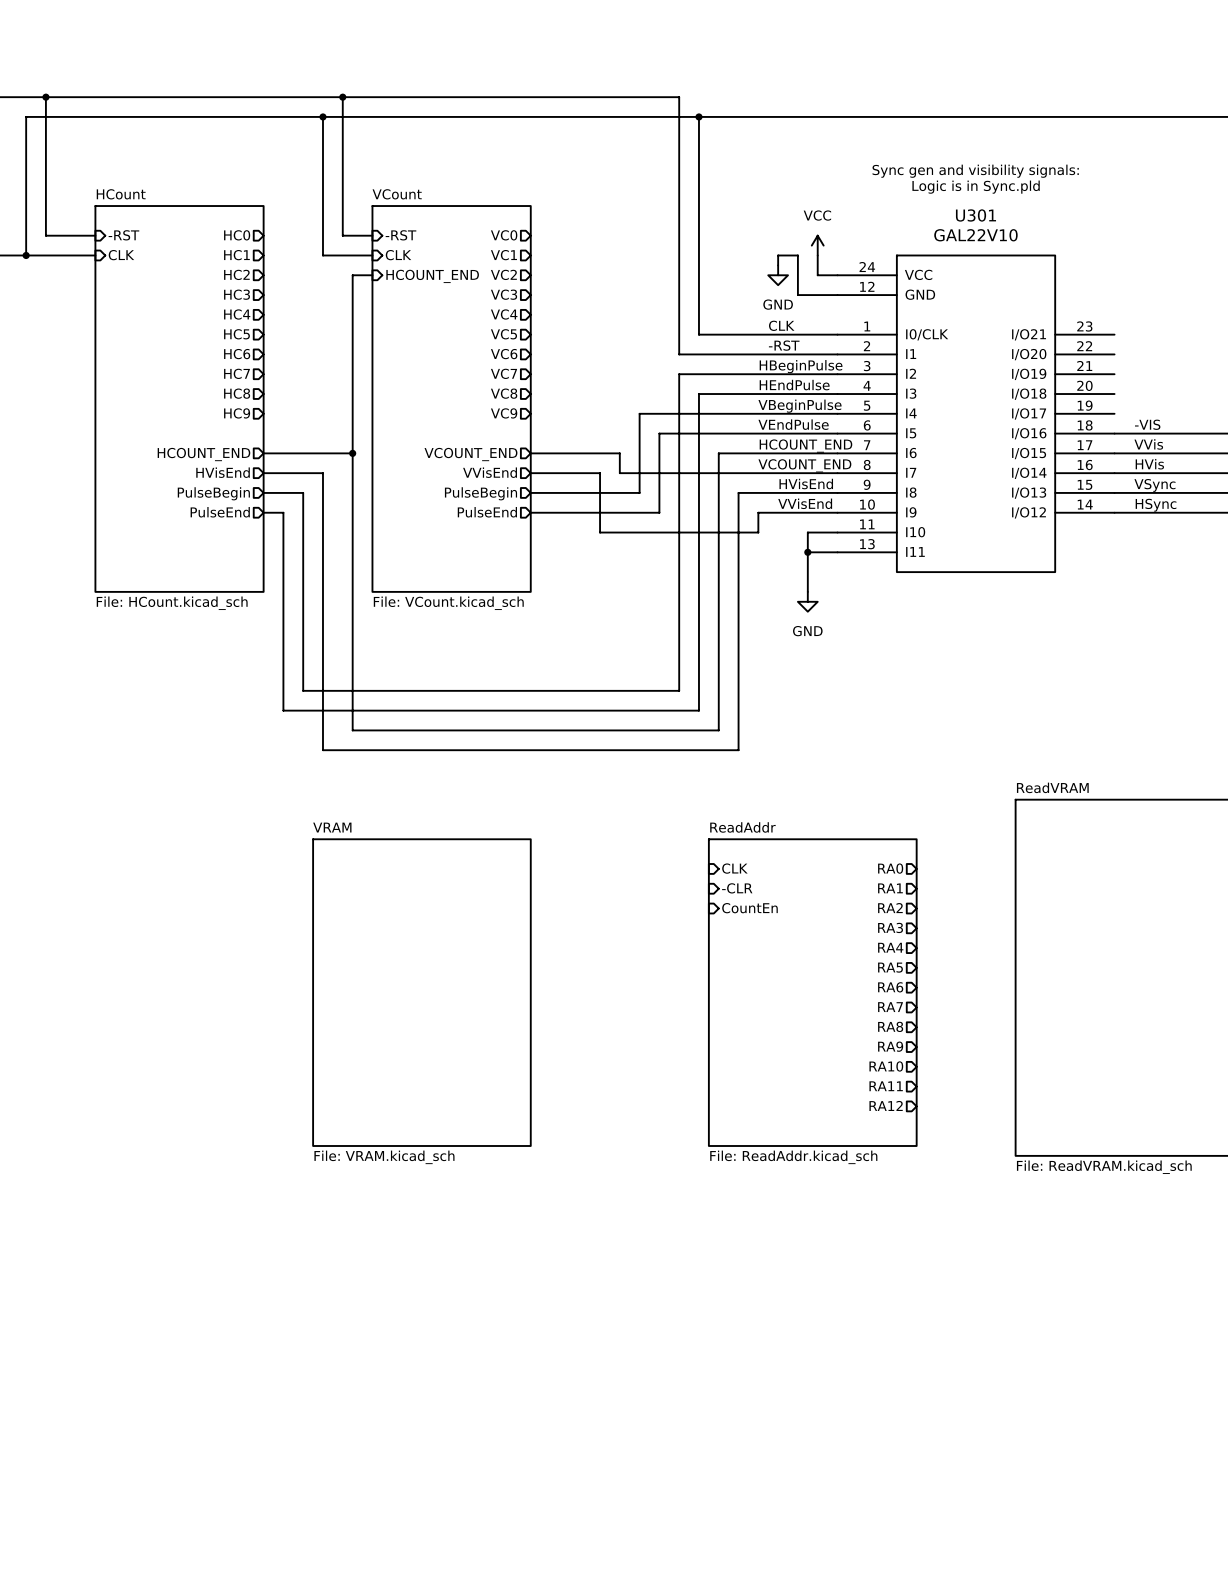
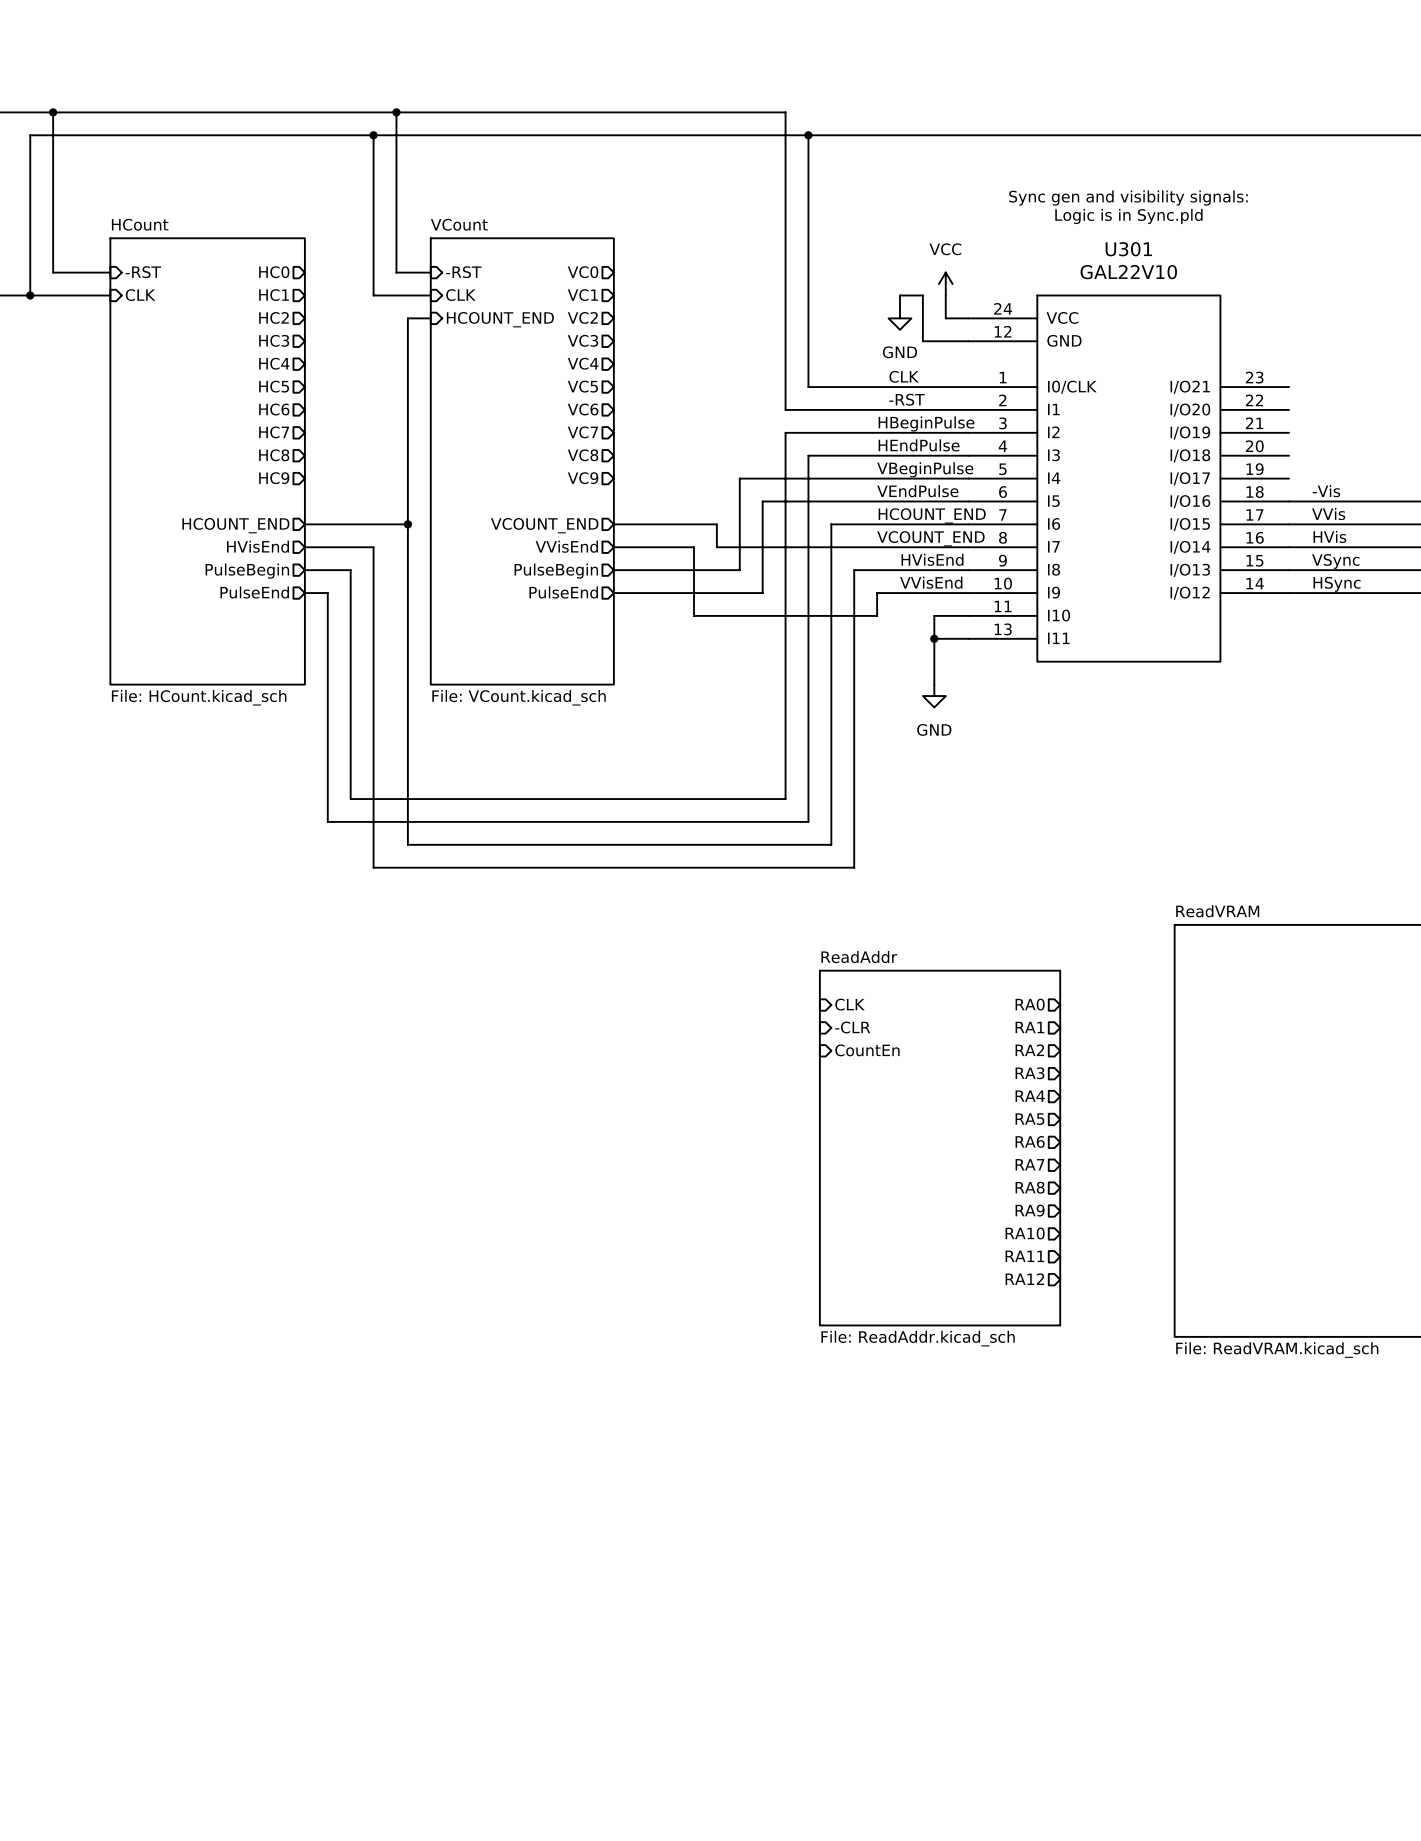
label: -VIS (1147, 424) -> -Vis (1326, 491)
sheet VRAM: File: VRAM.kicad_sch (421, 992) -> none

